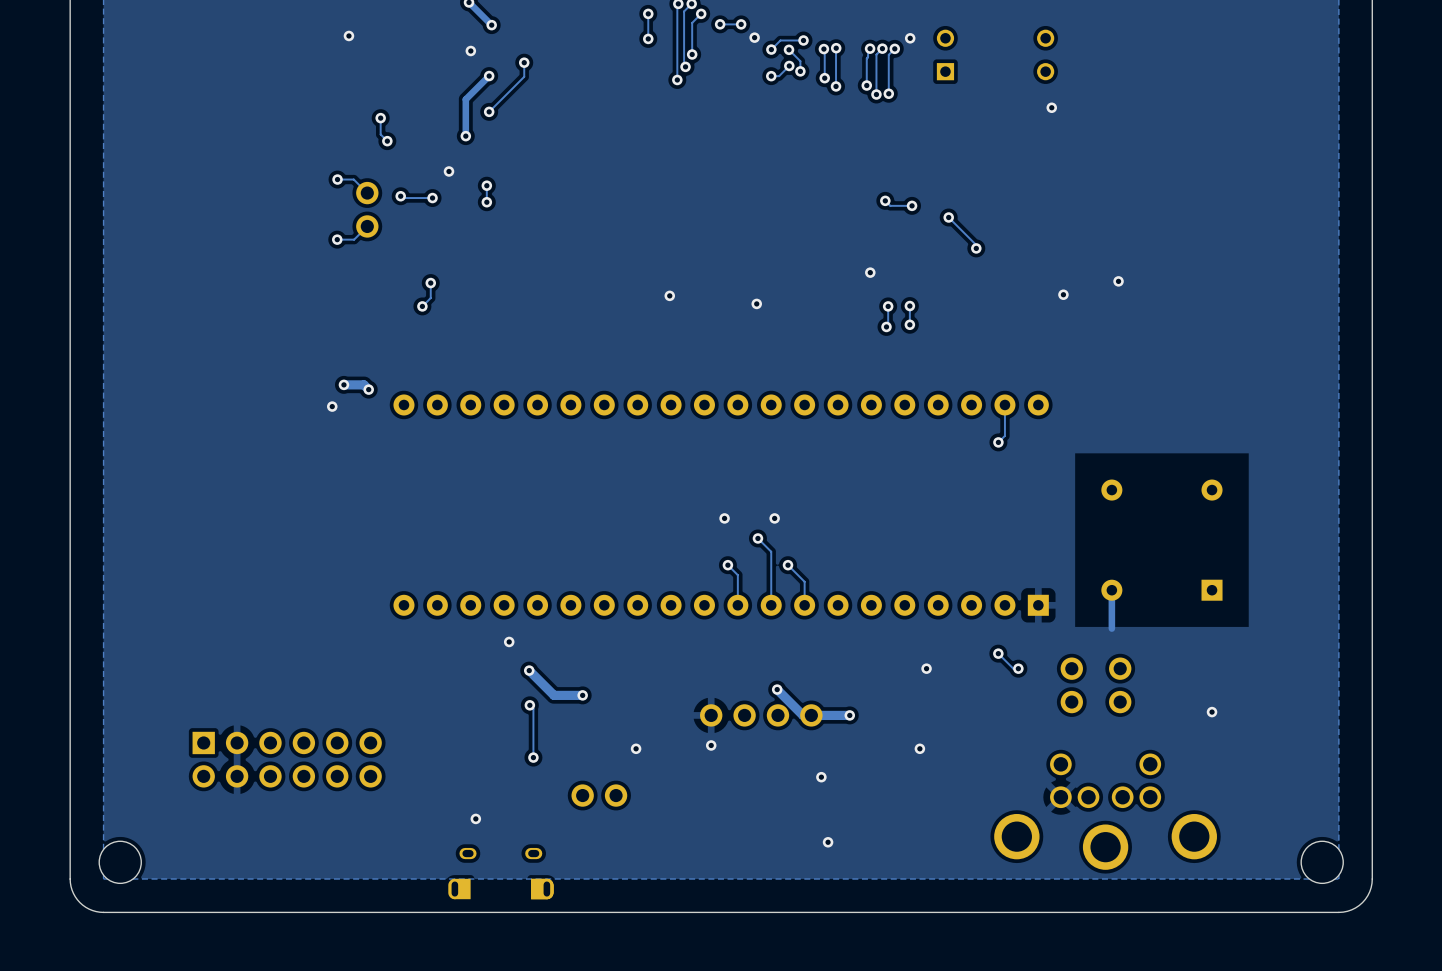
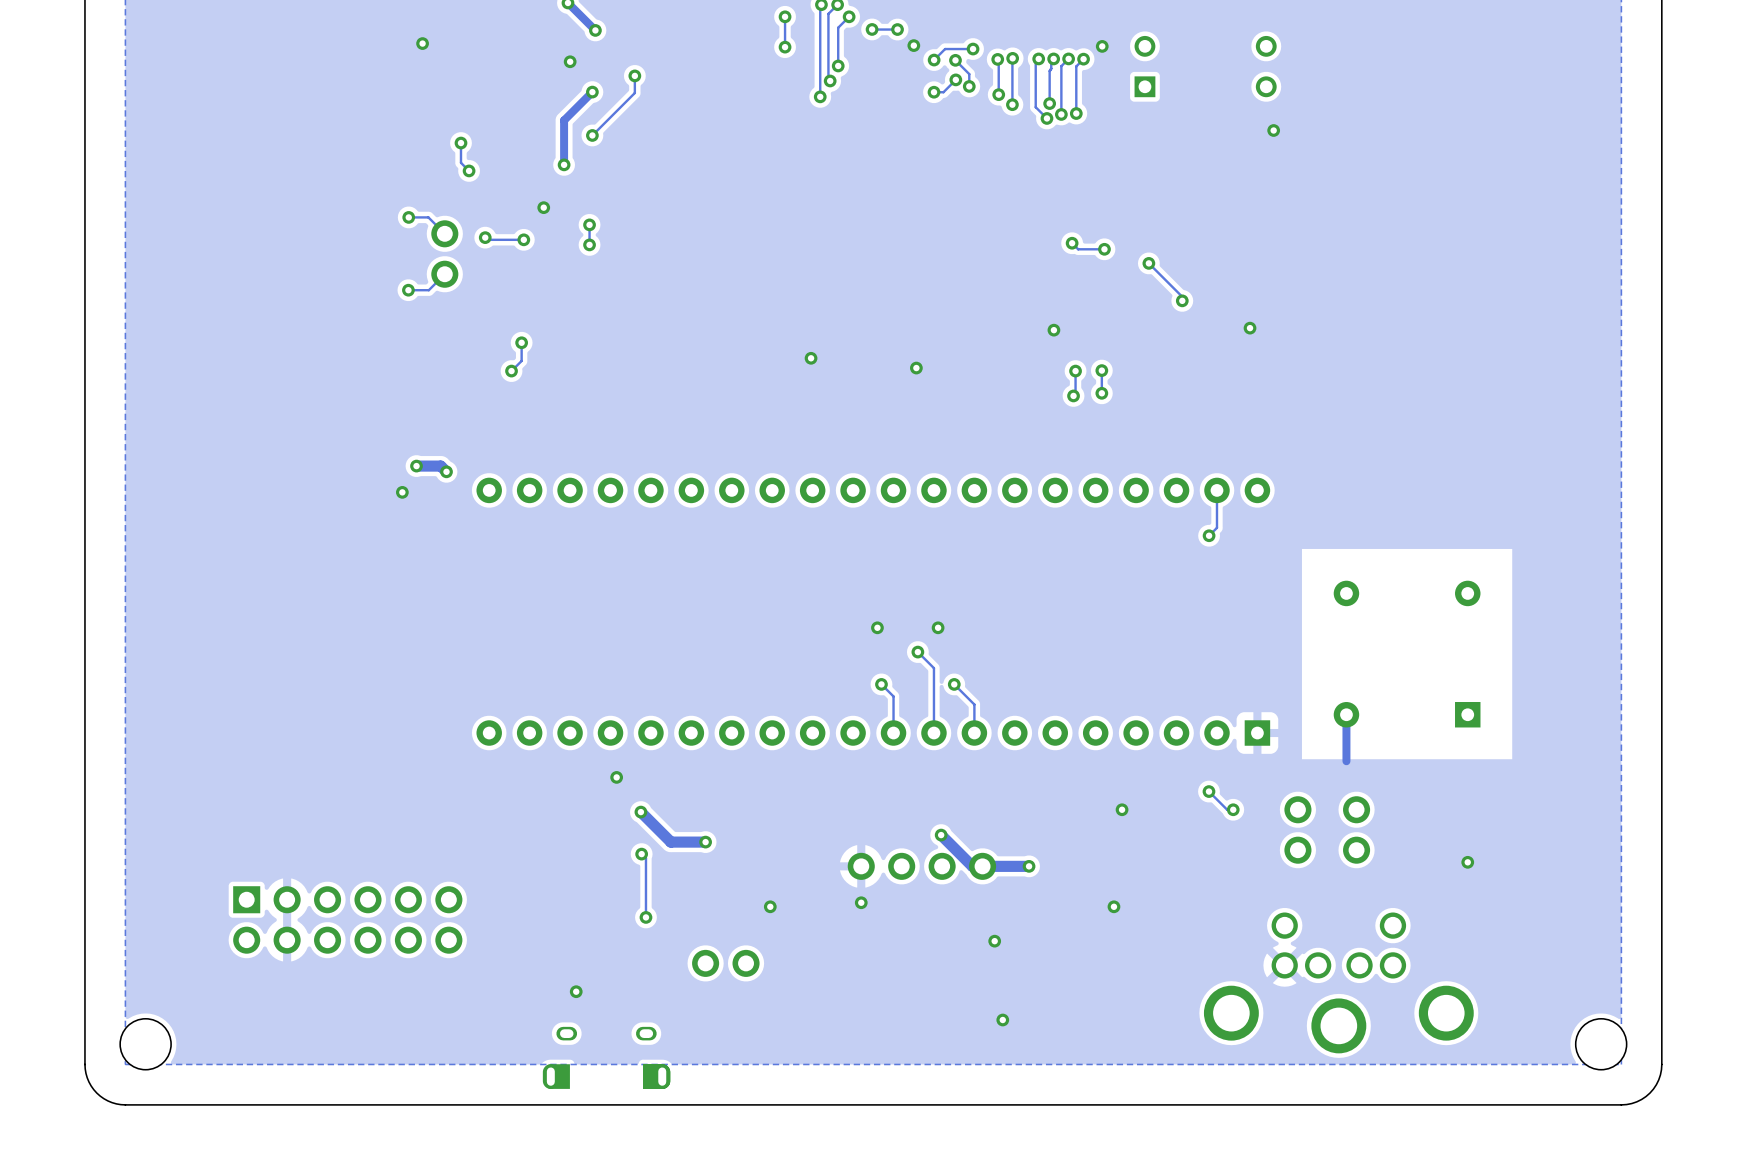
track: none -> (1038, 58) (1035, 61) (1035, 107) (1046, 118)
via: none -> (1038, 58)
via: none -> (1046, 118)
via: (1118, 281) -> none
via position: (1063, 294) -> (1250, 328)

